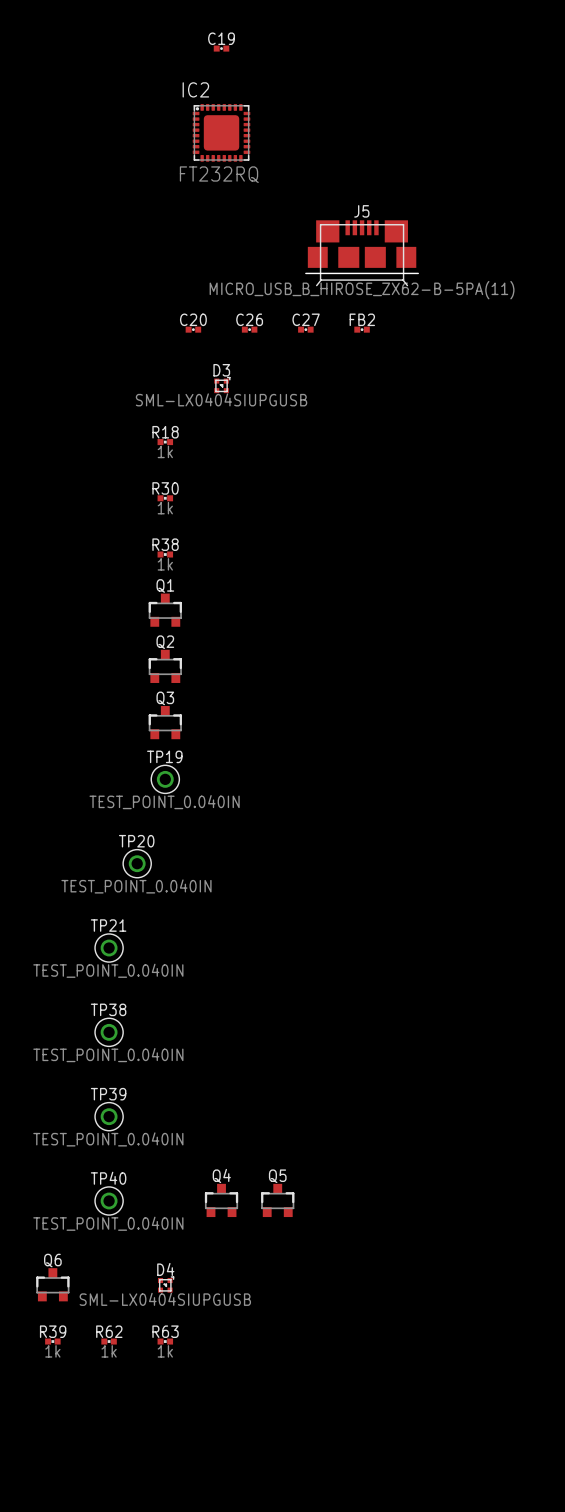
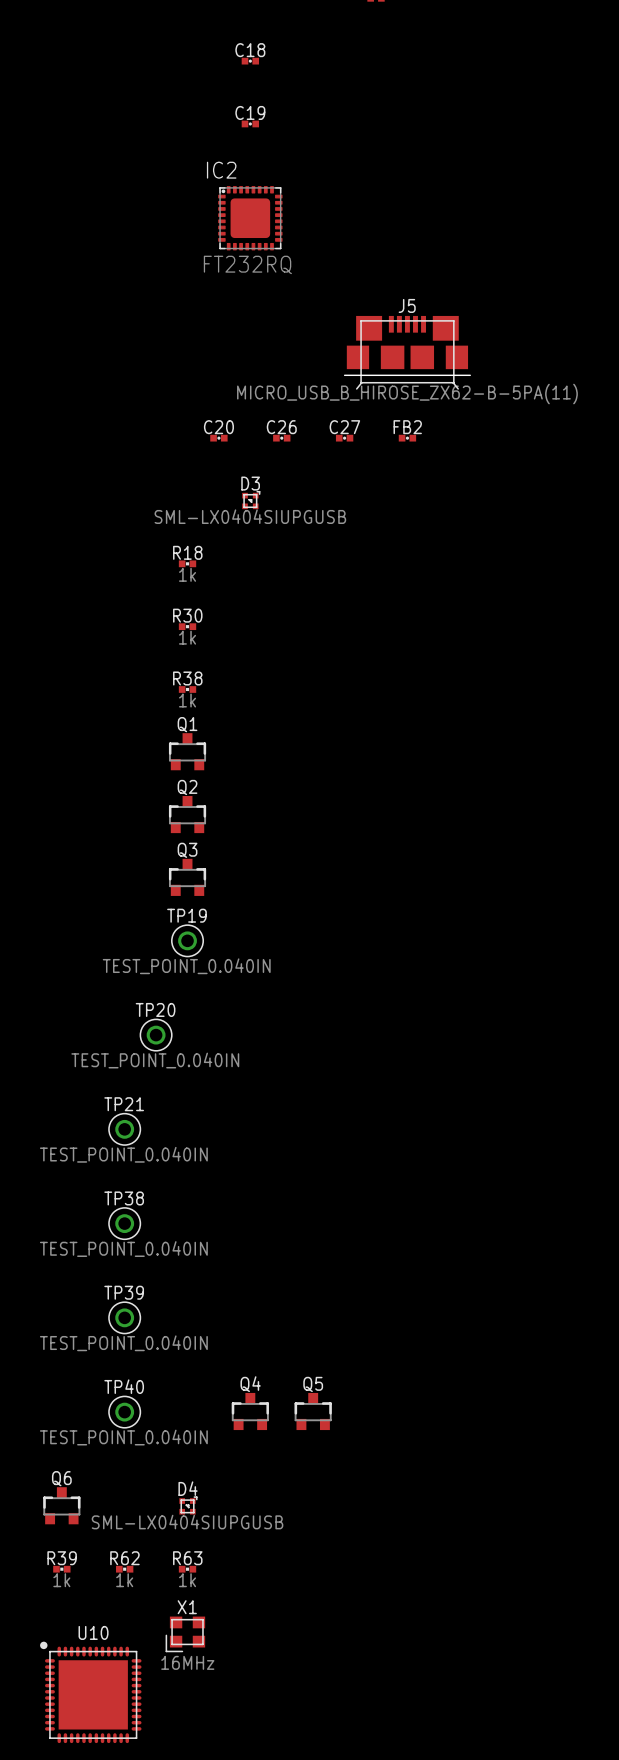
X1: none -> 16MHz (185, 1634)
U10: none -> (90, 1692)

